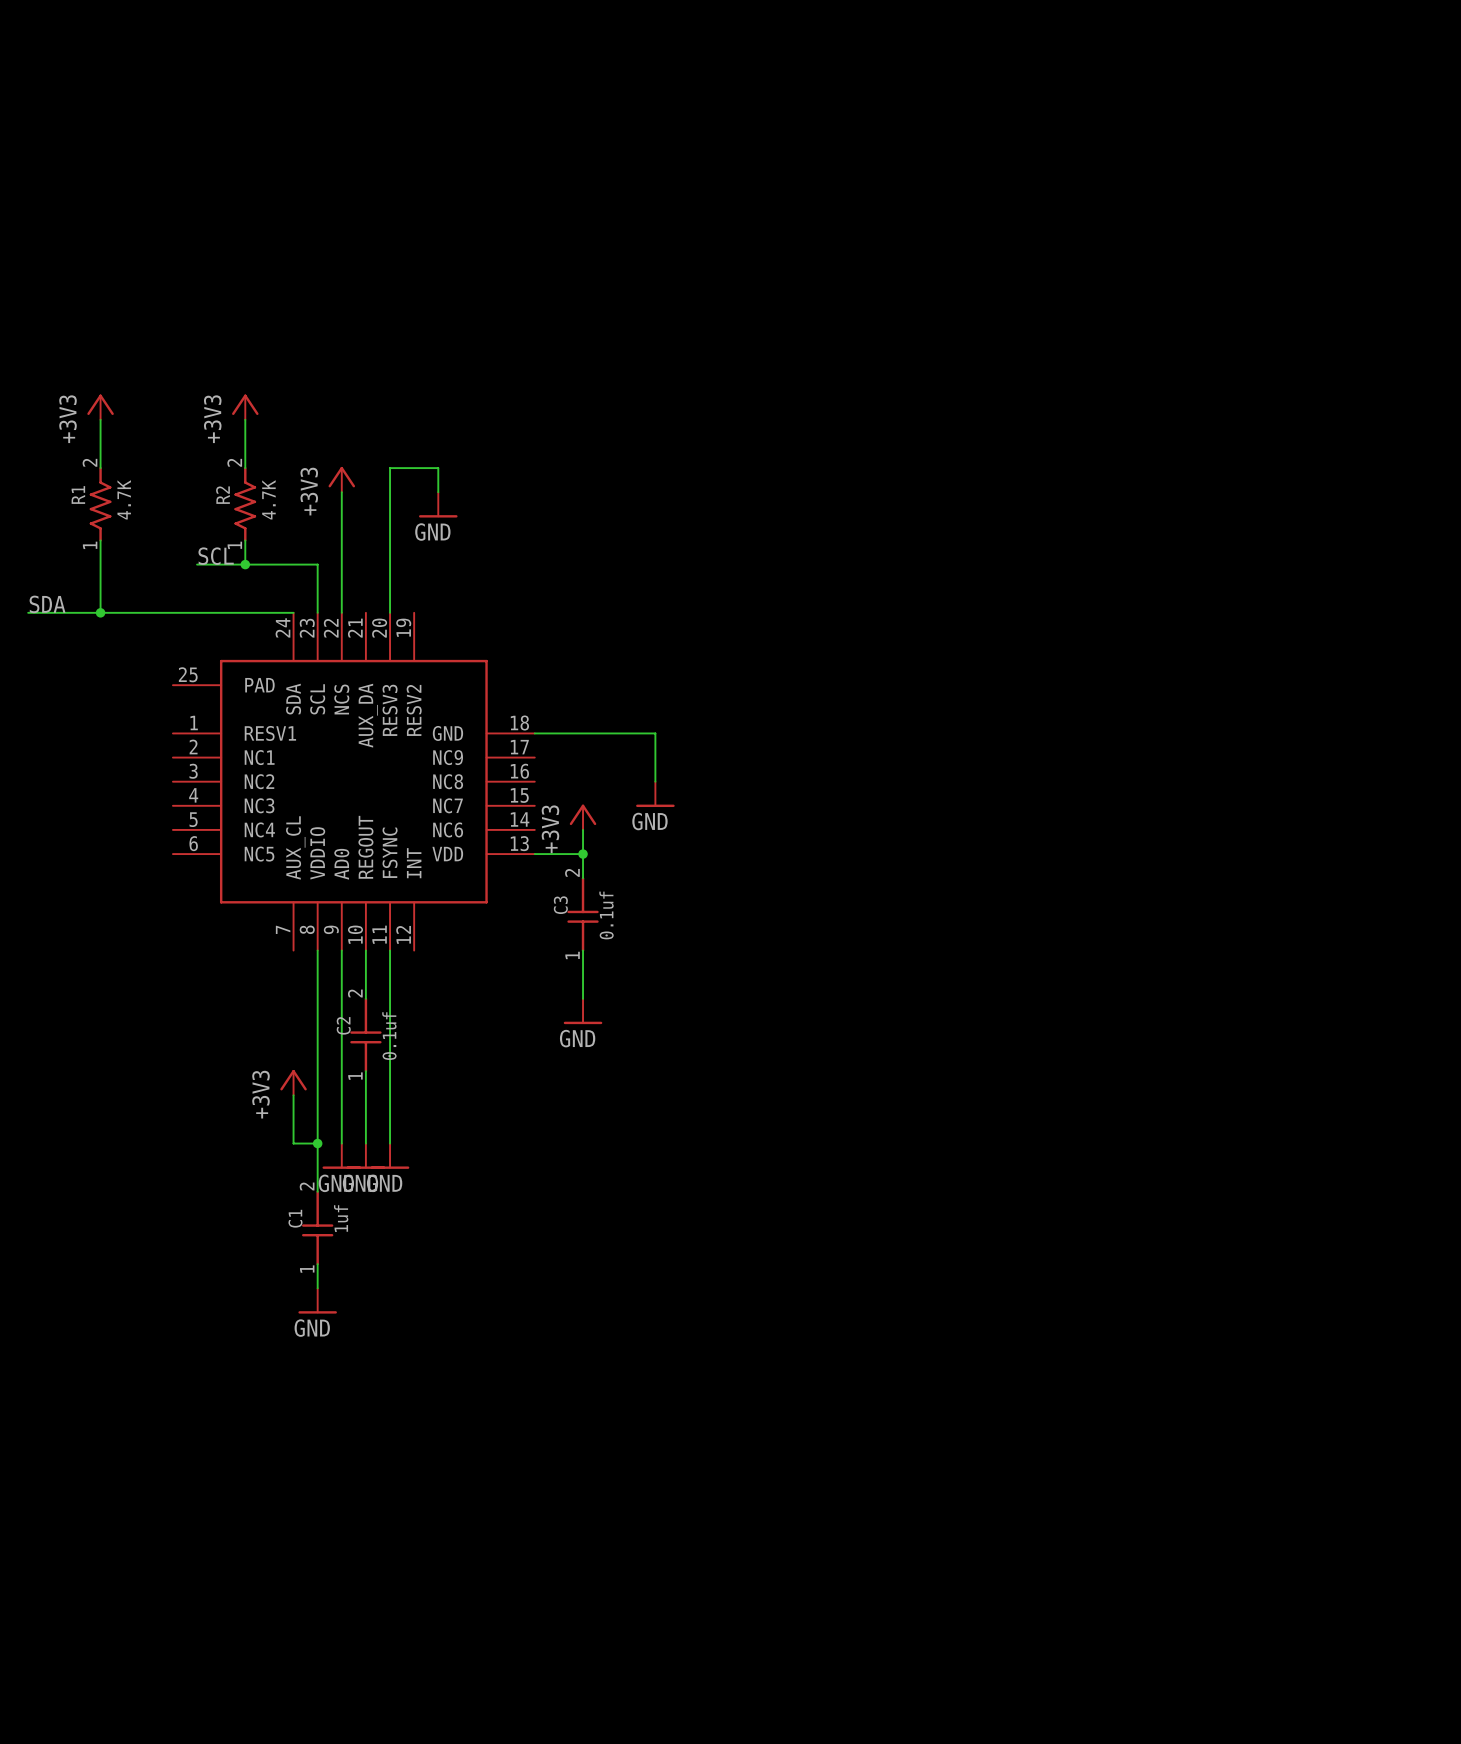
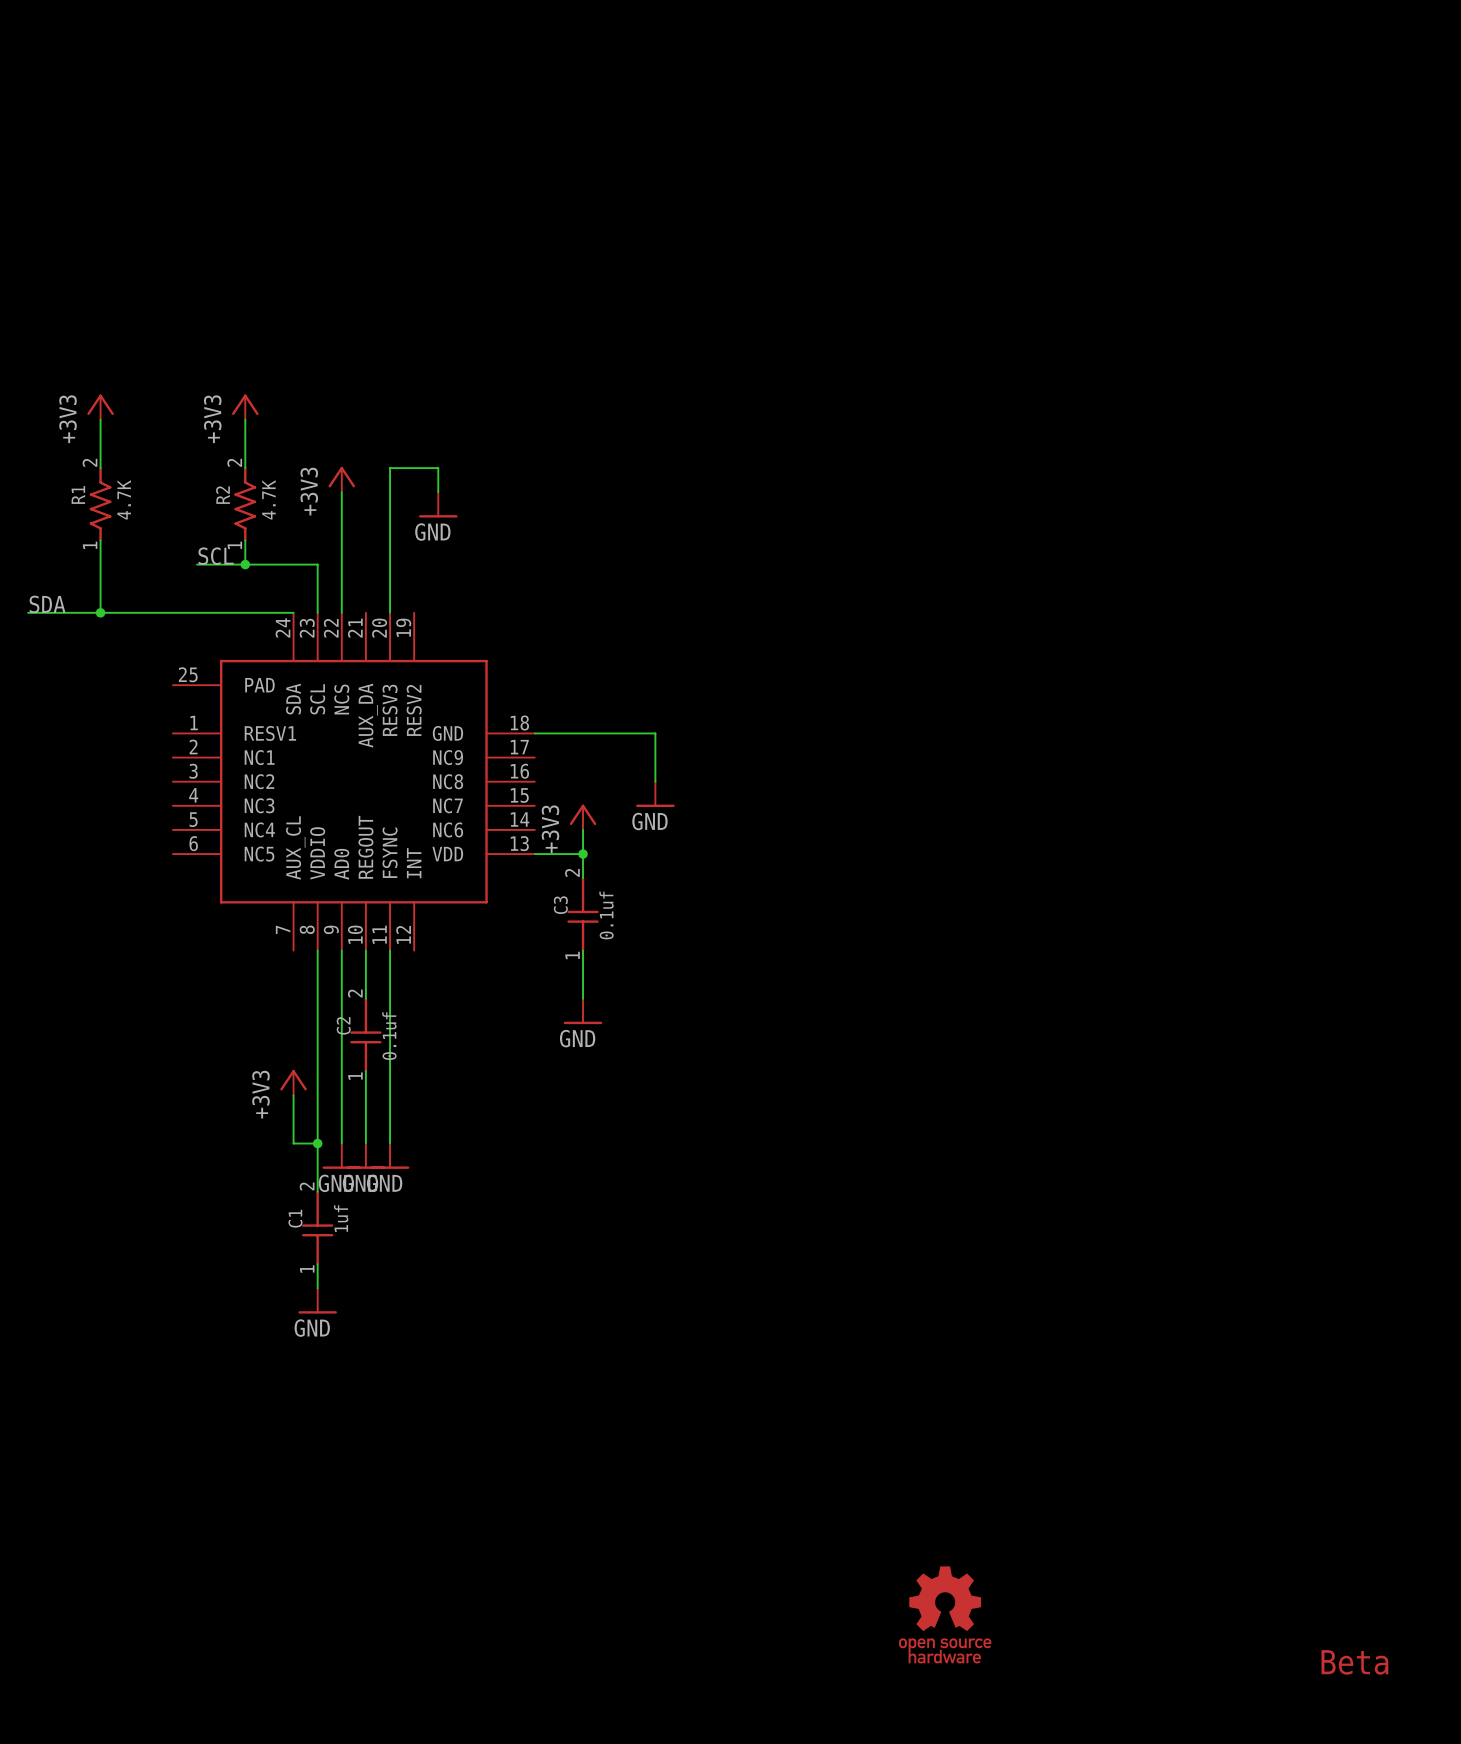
part: none -> (945, 1614)
text: none -> Beta (1354, 1662)

